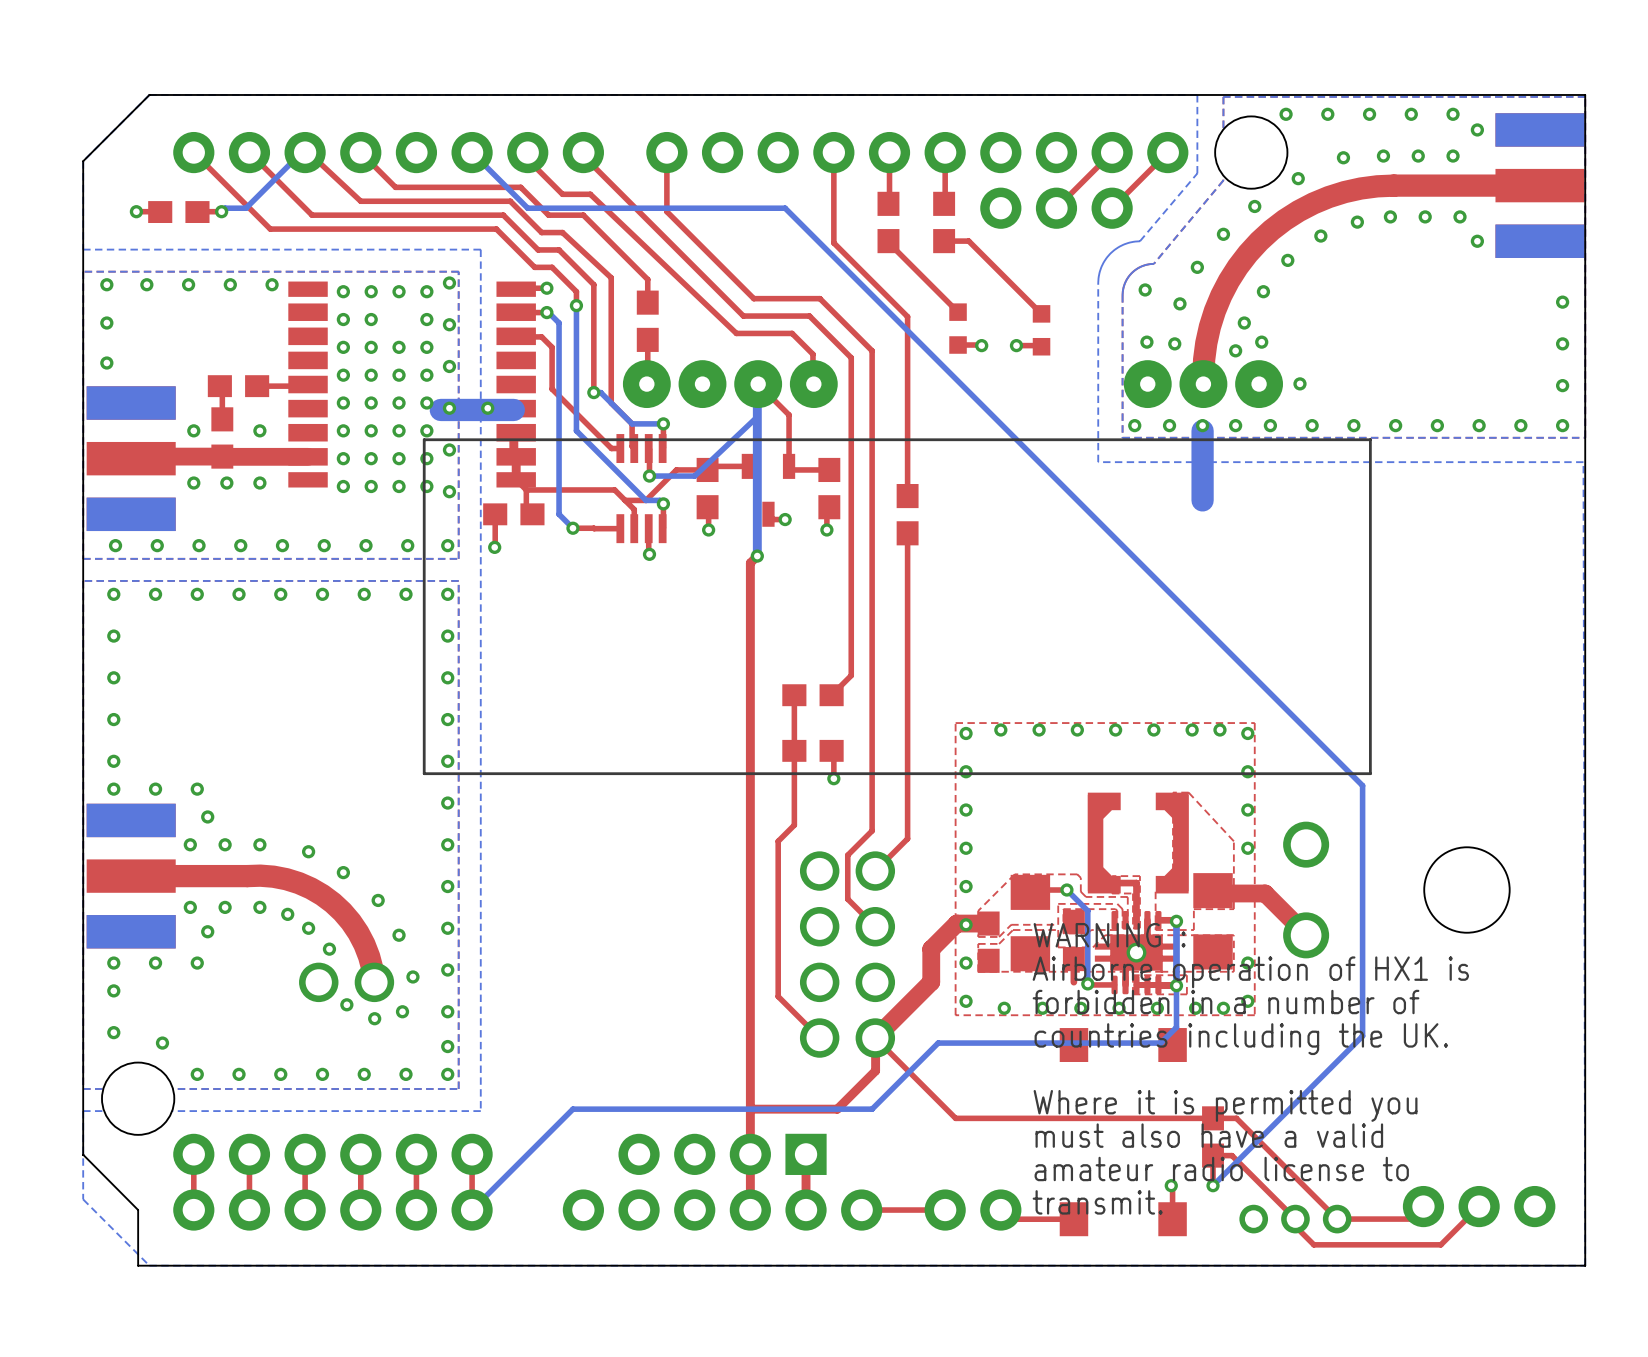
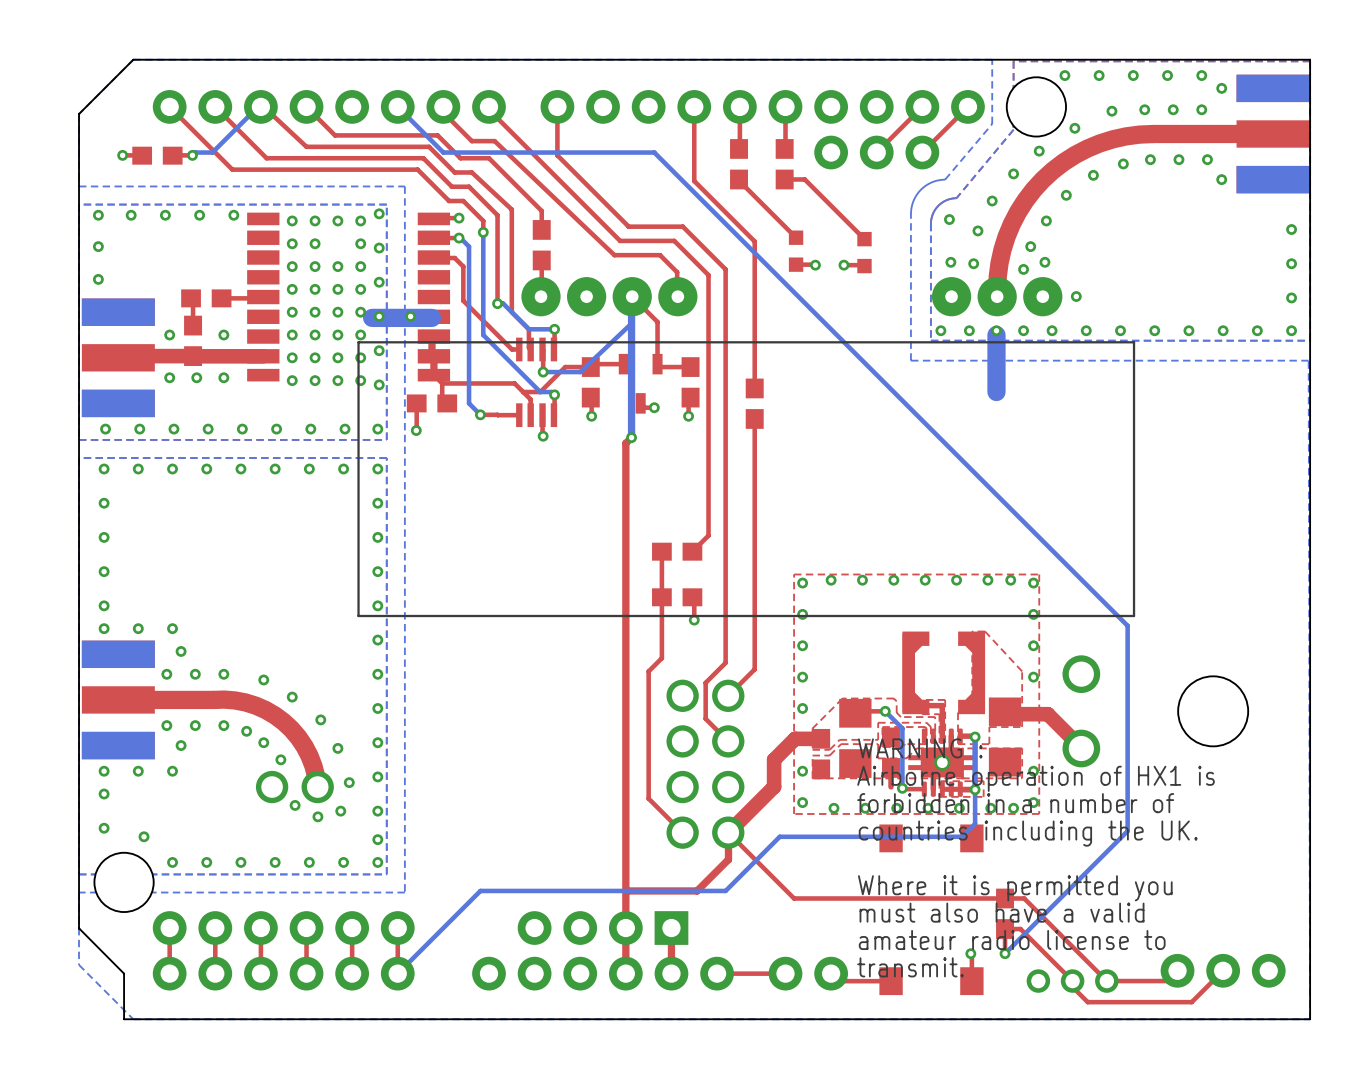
via: (966, 924) -> none

